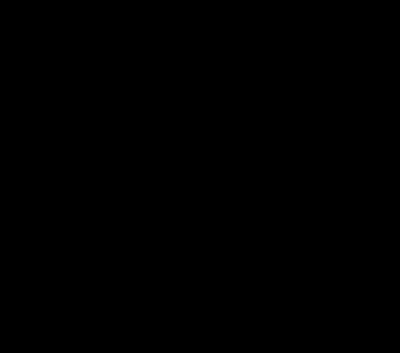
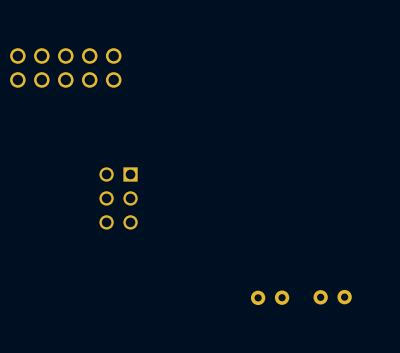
part: none -> (65, 67)
part: none -> (118, 198)
part: none -> (270, 297)
part: none -> (332, 297)

